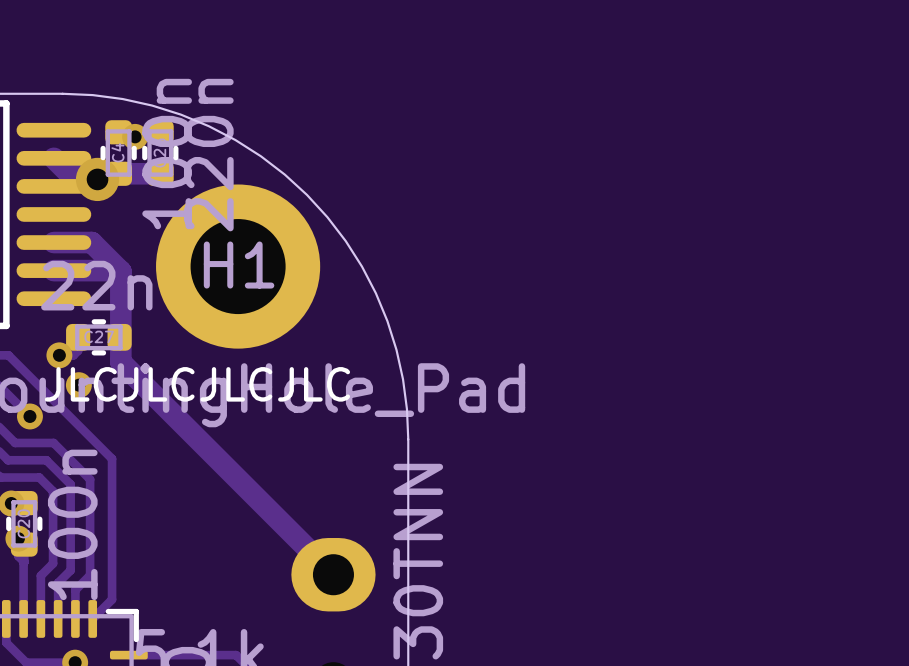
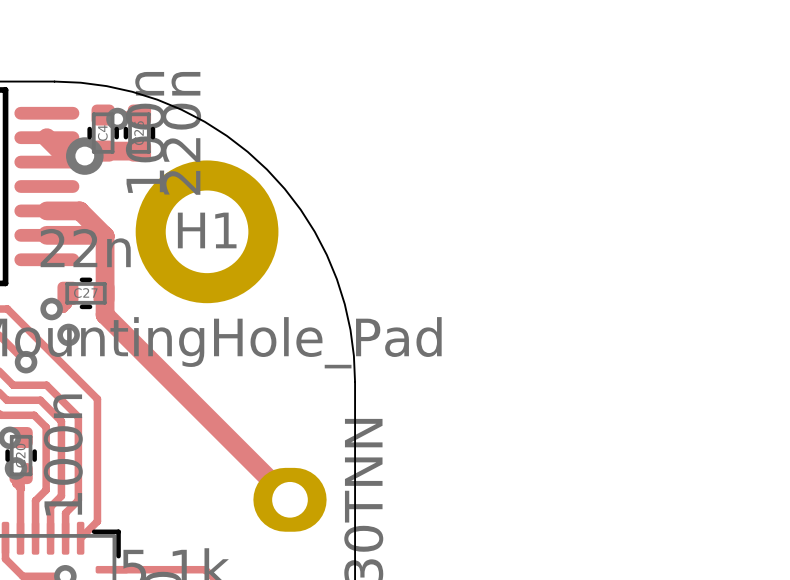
text: JLCJLCJLCJLC (197, 384) -> none

